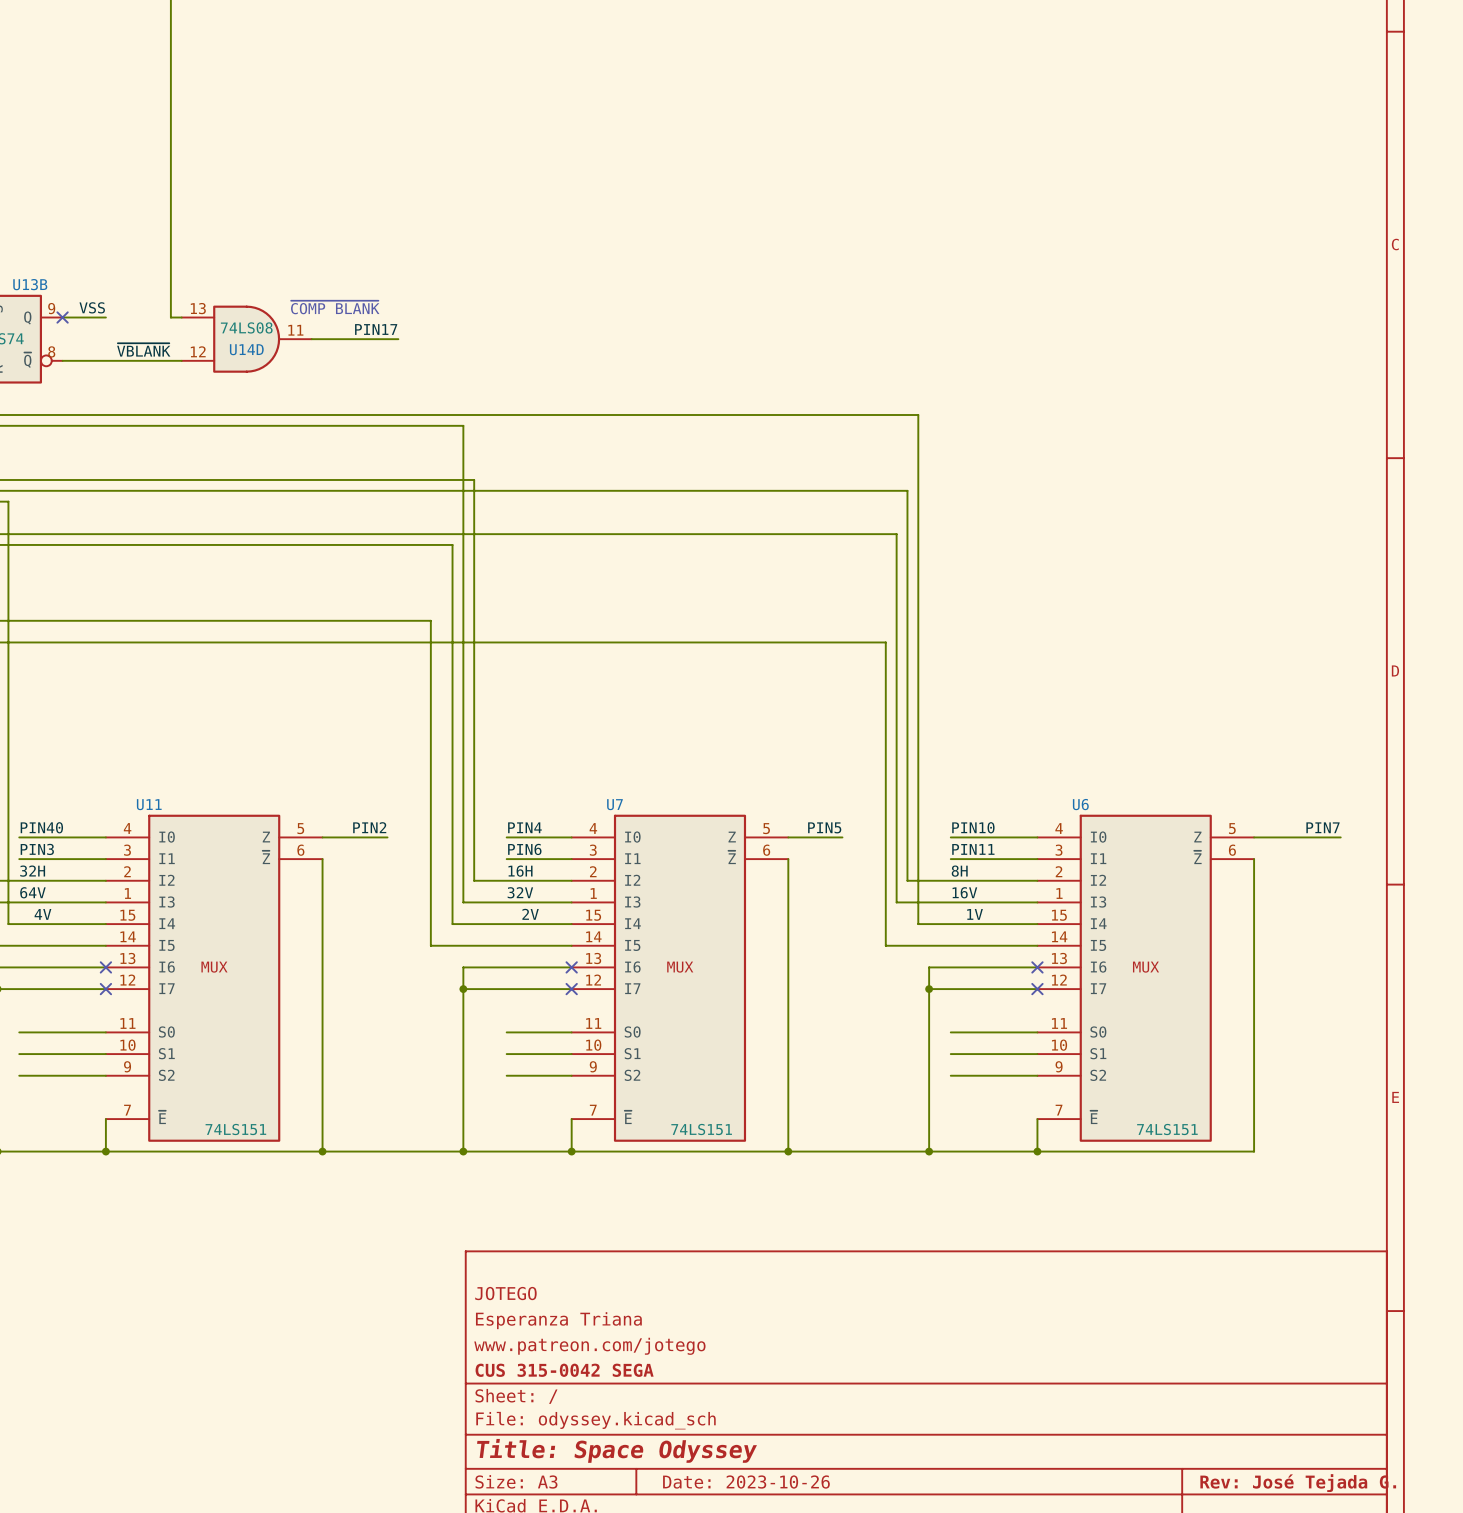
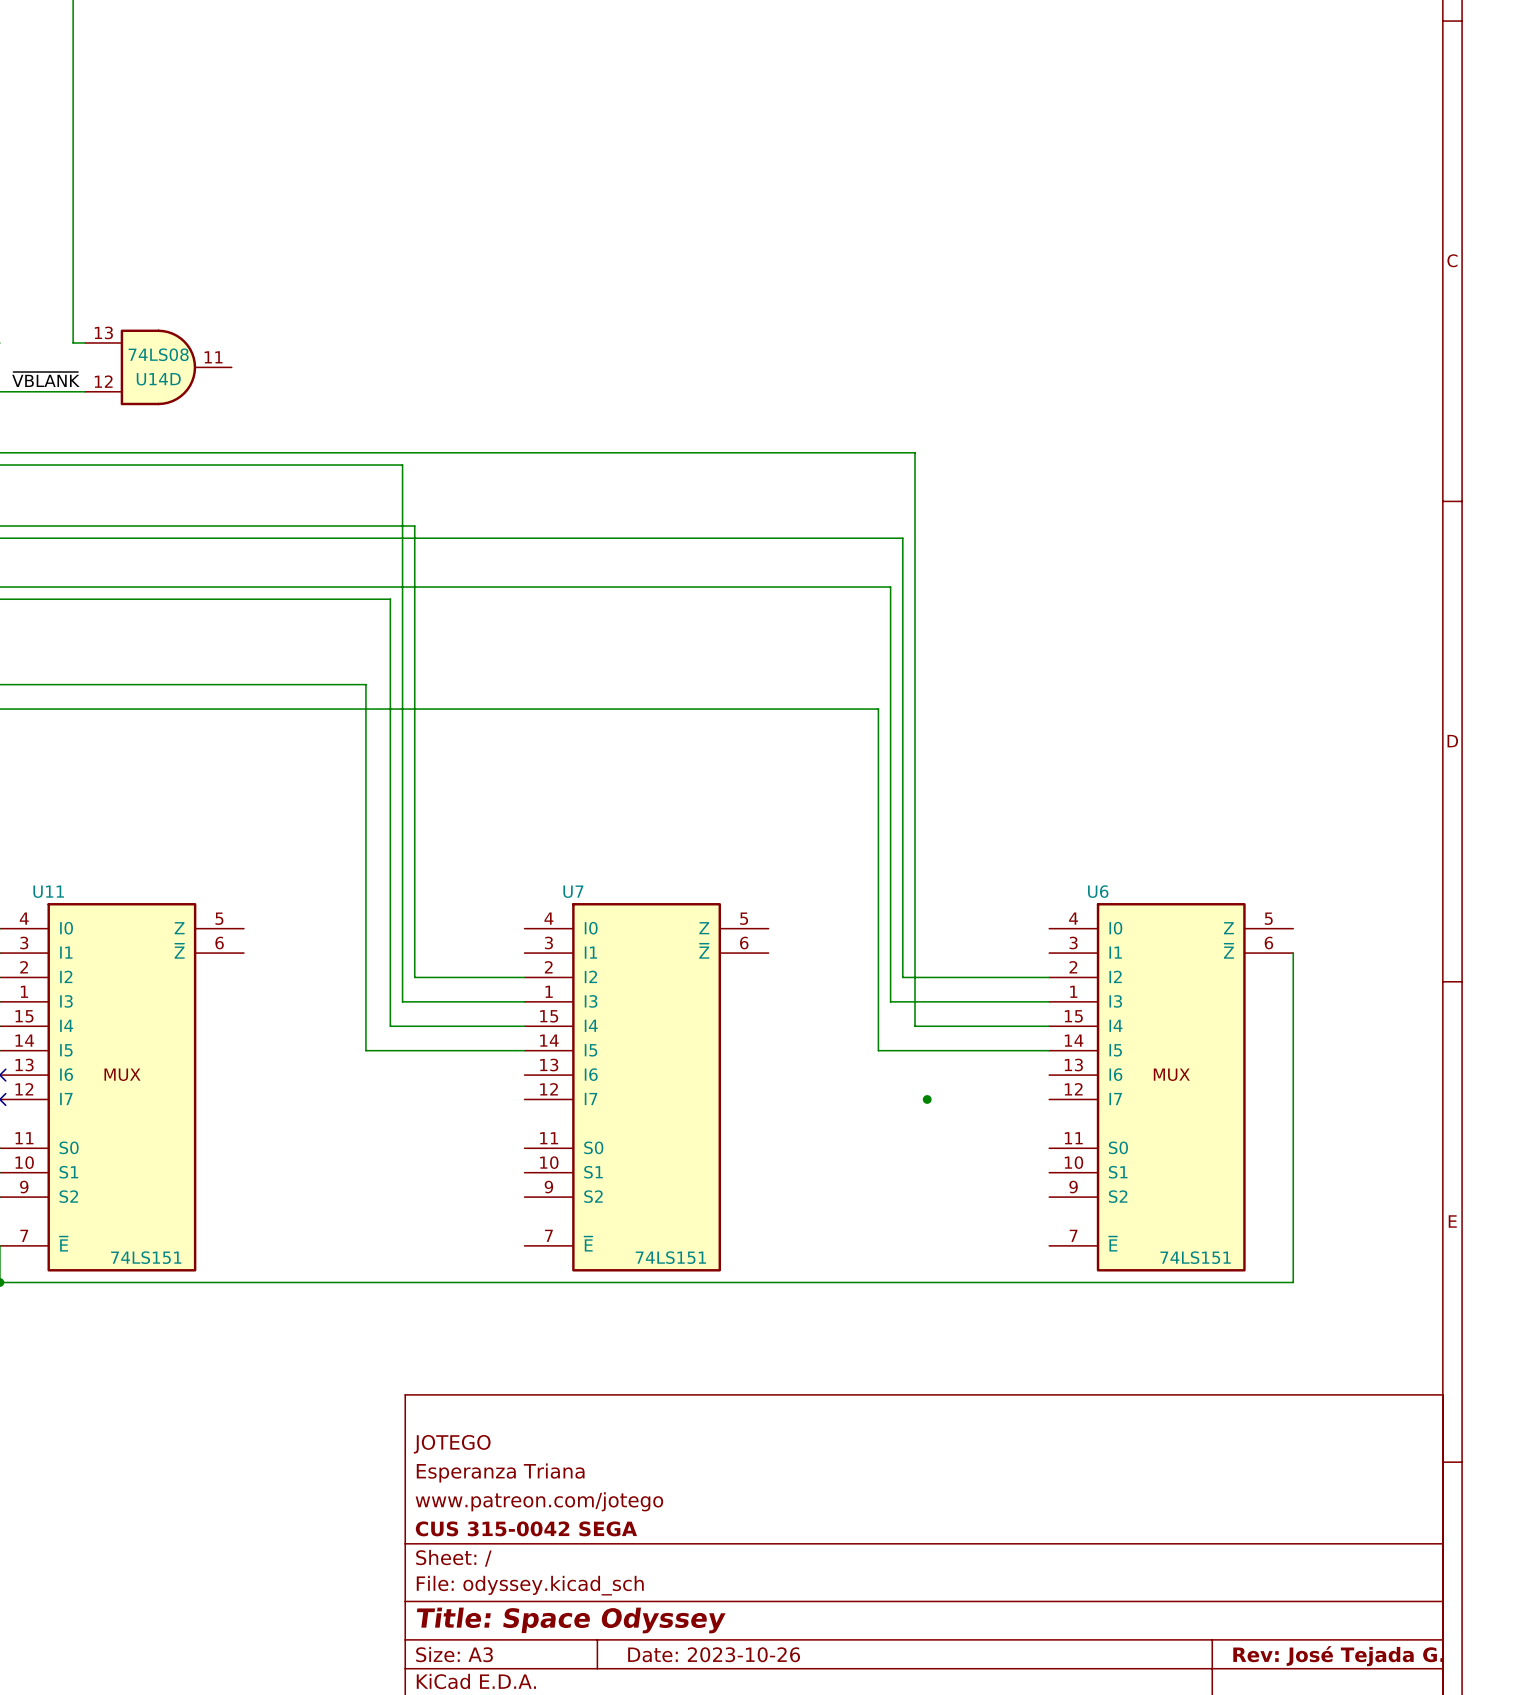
text: ~{COMP BLANK} (335, 307) -> none
label: PIN17 (376, 329) -> none
wire: (311, 339) (398, 339) -> none
label: PIN2 (369, 827) -> none
label: PIN4 (524, 827) -> none
label: PIN5 (824, 827) -> none
label: PIN10 (973, 827) -> none
label: PIN7 (1323, 827) -> none
wire: (322, 837) (387, 837) -> none
wire: (506, 837) (571, 837) -> none
wire: (788, 837) (842, 837) -> none
wire: (950, 837) (1037, 837) -> none
wire: (1254, 837) (1340, 837) -> none
label: PIN6 (524, 849) -> none
label: PIN11 (973, 849) -> none
wire: (322, 859) (322, 1151) -> none
wire: (506, 859) (571, 859) -> none
wire: (788, 859) (788, 1151) -> none
wire: (950, 859) (1037, 859) -> none
label: 16H (520, 871) -> none
label: 8H (959, 871) -> none
label: 32V (520, 892) -> none
label: 16V (964, 892) -> none
label: 2V (530, 914) -> none
label: 1V (975, 914) -> none
wire: (571, 967) (463, 967) (463, 1151) -> none
no-connect mark: (571, 967) -> none
U7 text: MUX (680, 967) -> none
wire: (1037, 967) (929, 967) (929, 1151) -> none
no-connect mark: (1037, 967) -> none
wire: (463, 989) (571, 989) -> none
junction: (463, 989) -> none
no-connect mark: (571, 989) -> none
wire: (929, 989) (1037, 989) -> none
no-connect mark: (1037, 989) -> none
wire: (506, 1032) (571, 1032) -> none
wire: (950, 1032) (1037, 1032) -> none
wire: (506, 1054) (571, 1054) -> none
wire: (950, 1054) (1037, 1054) -> none
wire: (506, 1075) (571, 1075) -> none
wire: (950, 1075) (1037, 1075) -> none
wire: (571, 1119) (571, 1151) -> none
wire: (1037, 1119) (1037, 1151) -> none
junction: (322, 1151) -> none
junction: (463, 1151) -> none
junction: (571, 1151) -> none
junction: (788, 1151) -> none
junction: (929, 1151) -> none
junction: (1037, 1151) -> none

